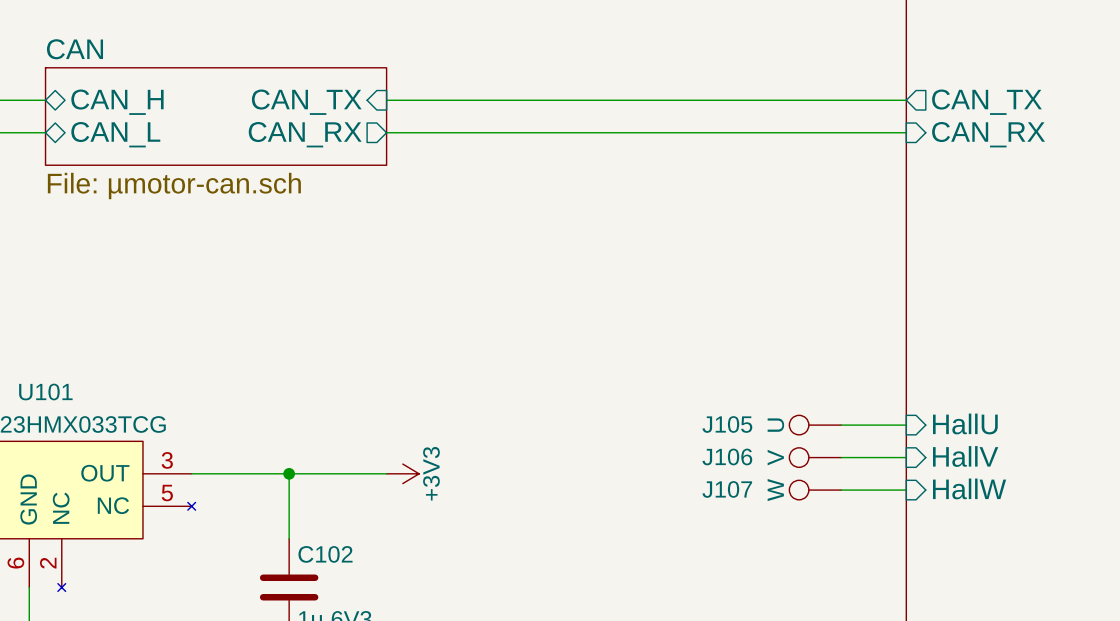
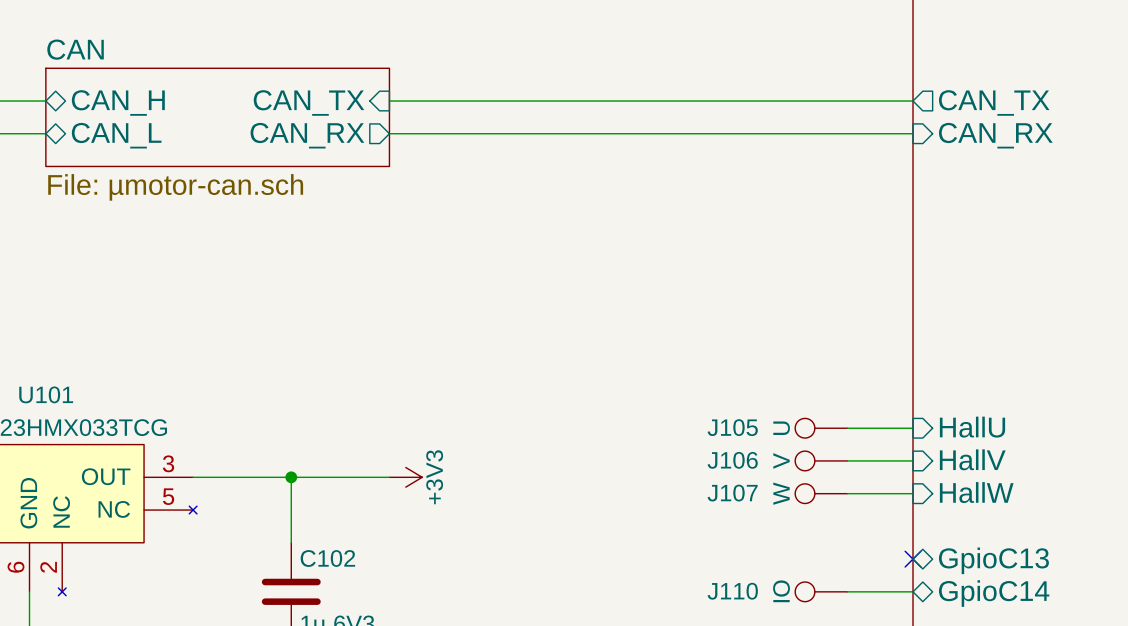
no-connect mark: none -> (913, 559)
sheet pin: none -> GpioC13 (993, 560)
J110: none -> IO (821, 591)
wire: none -> (847, 591) (913, 591)
sheet pin: none -> GpioC14 (994, 593)

